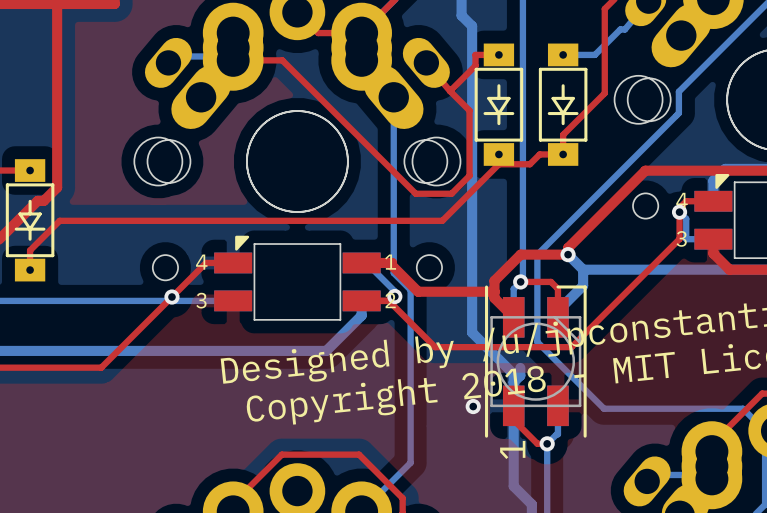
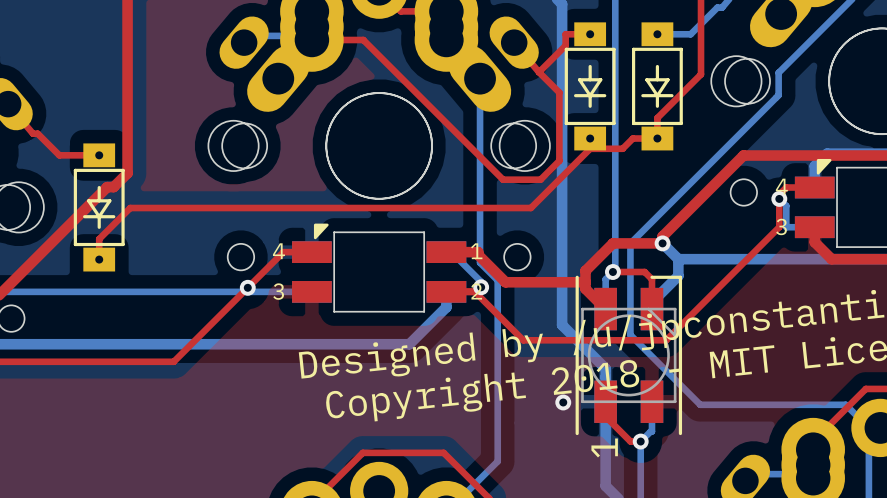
bottom track: (520, 367) (520, 375) (513, 382) -> none

